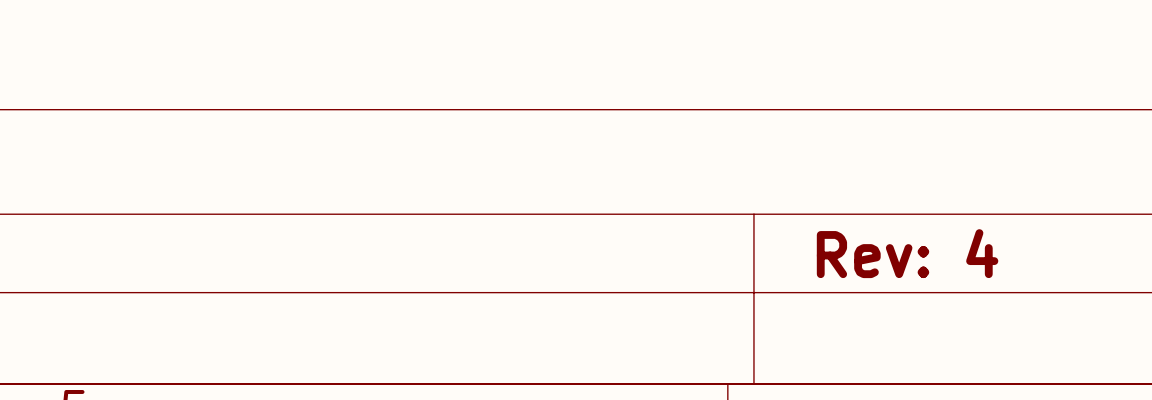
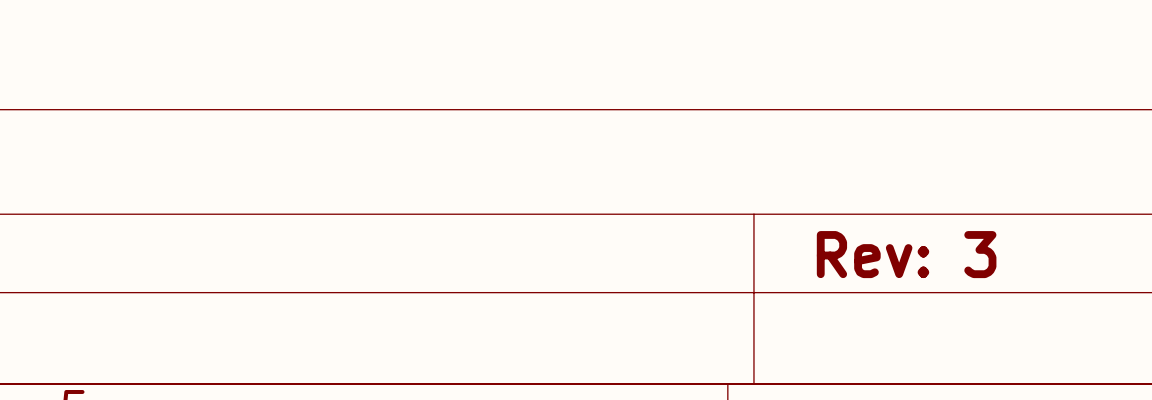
title block: Rev: 4 (907, 253) -> Rev: 3 (906, 254)

